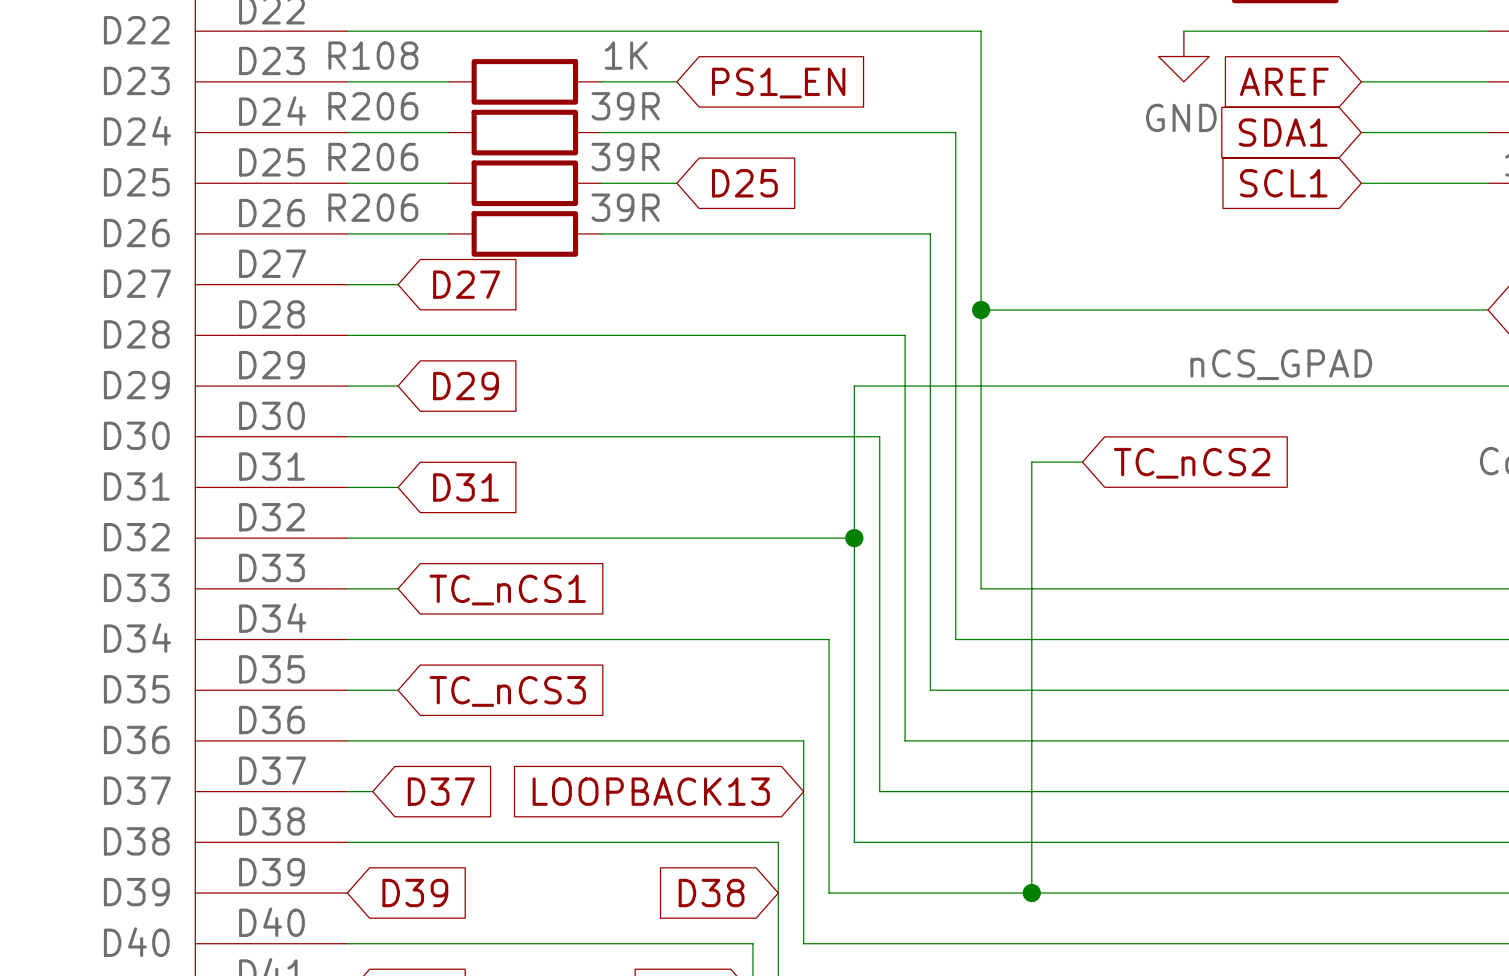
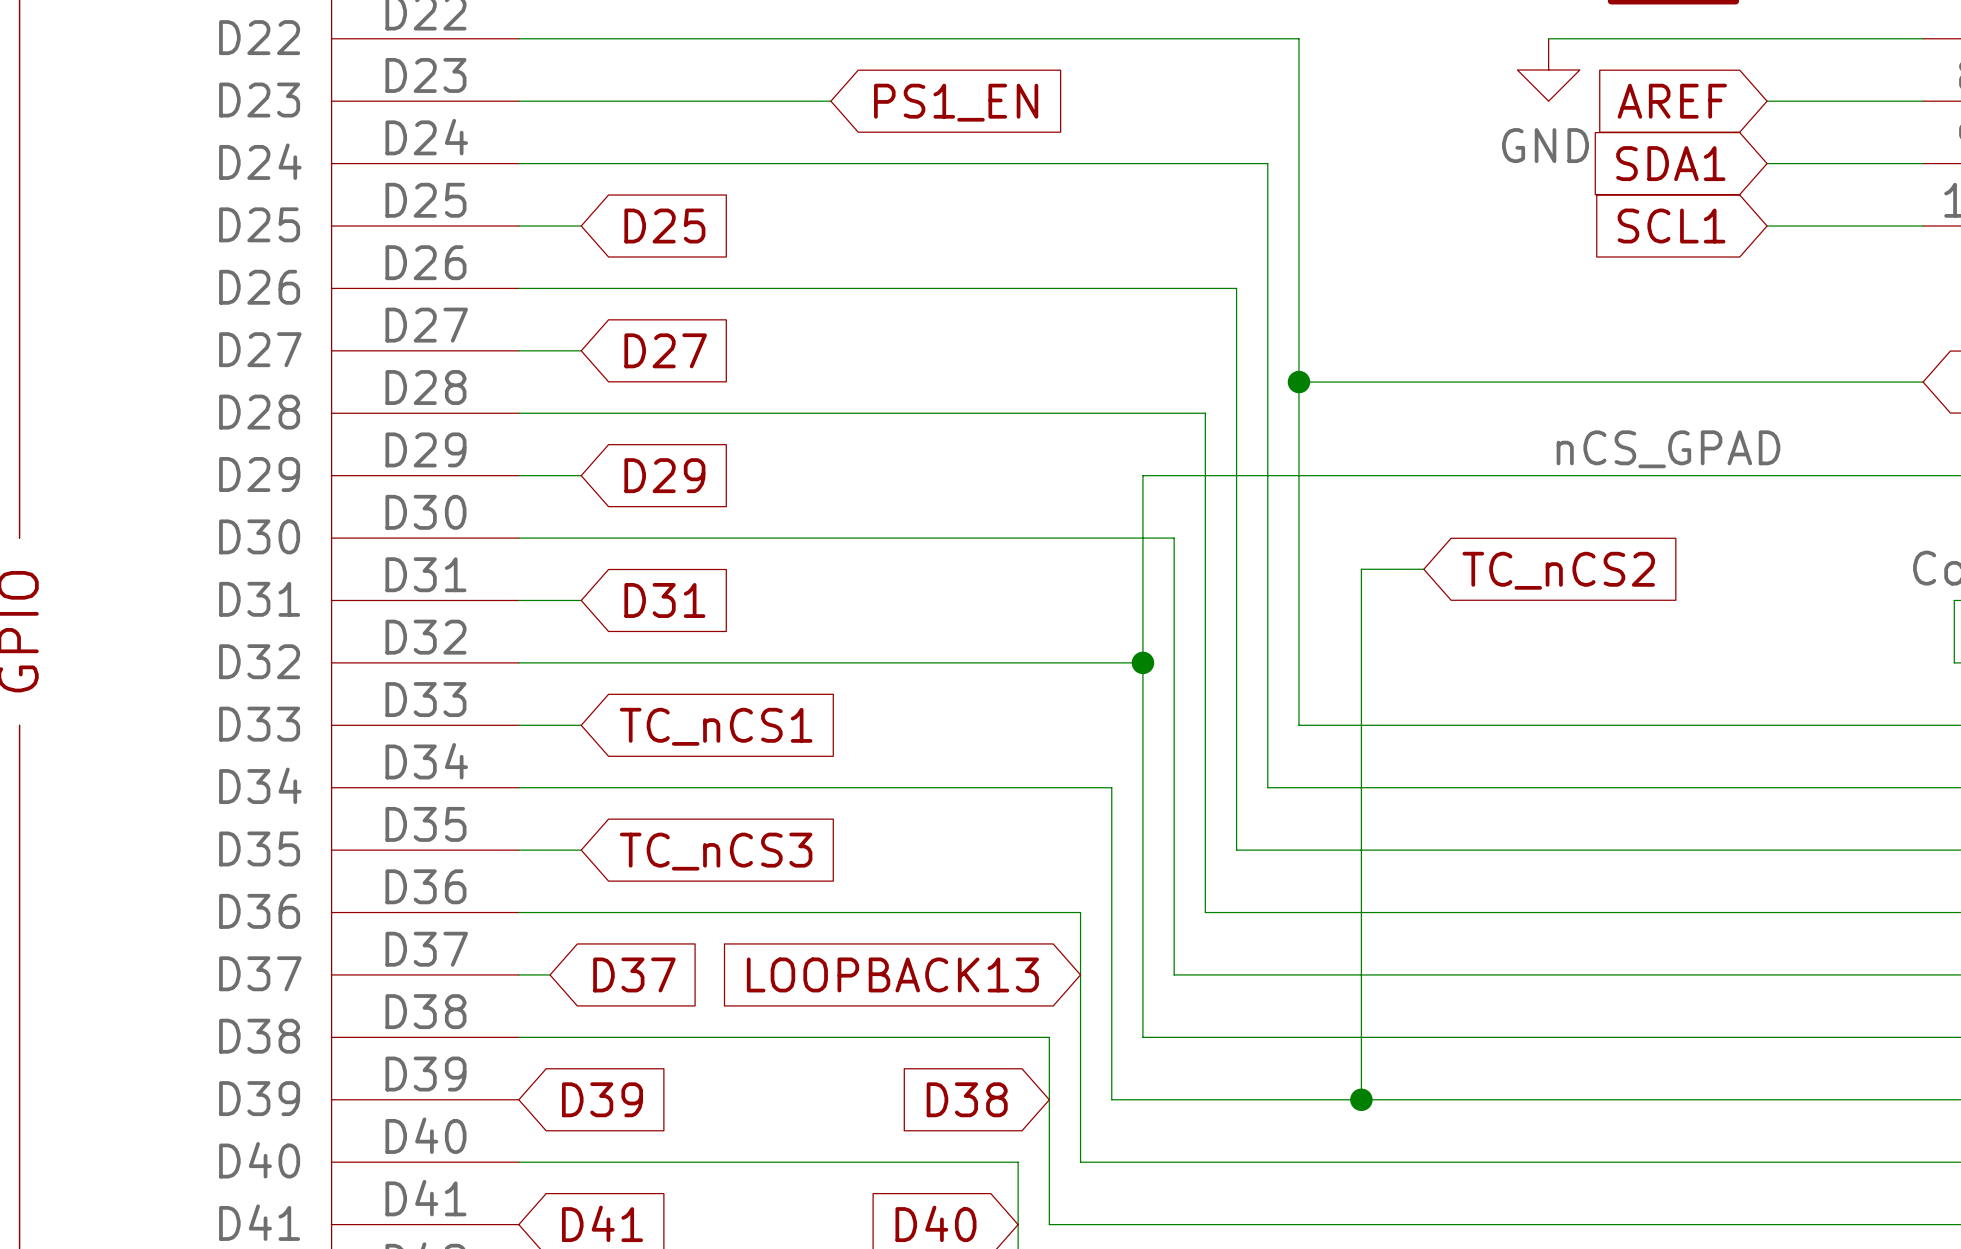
R108: 1K (524, 81) -> none
wire: (600, 81) (676, 81) -> (830, 101) (643, 101)
global label position: PS1_EN (778, 83) -> PS1_EN (956, 102)
wire: none -> (643, 163) (830, 163)
R206: 39R (524, 132) -> none
wire: (398, 183) (448, 183) -> none
R206: 39R (524, 183) -> none
wire: (600, 183) (676, 183) -> none
global label position: D25 (744, 183) -> D25 (664, 226)
wire: none -> (643, 288) (830, 288)
R206: 39R (524, 233) -> none

